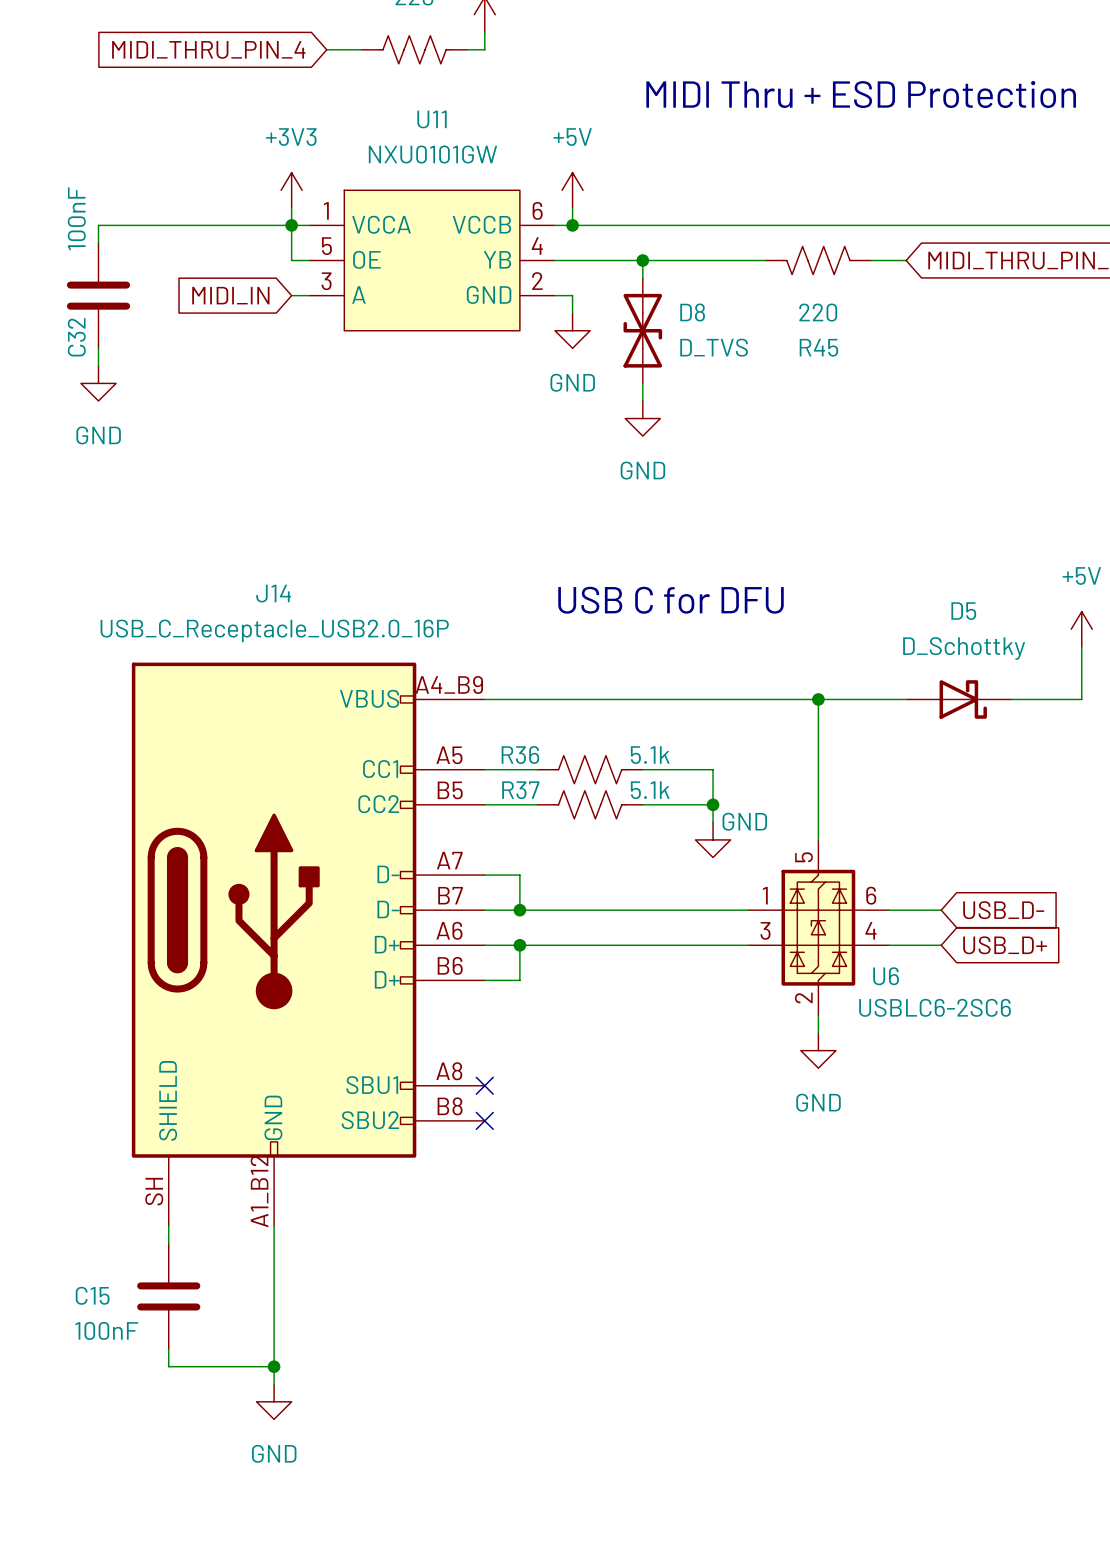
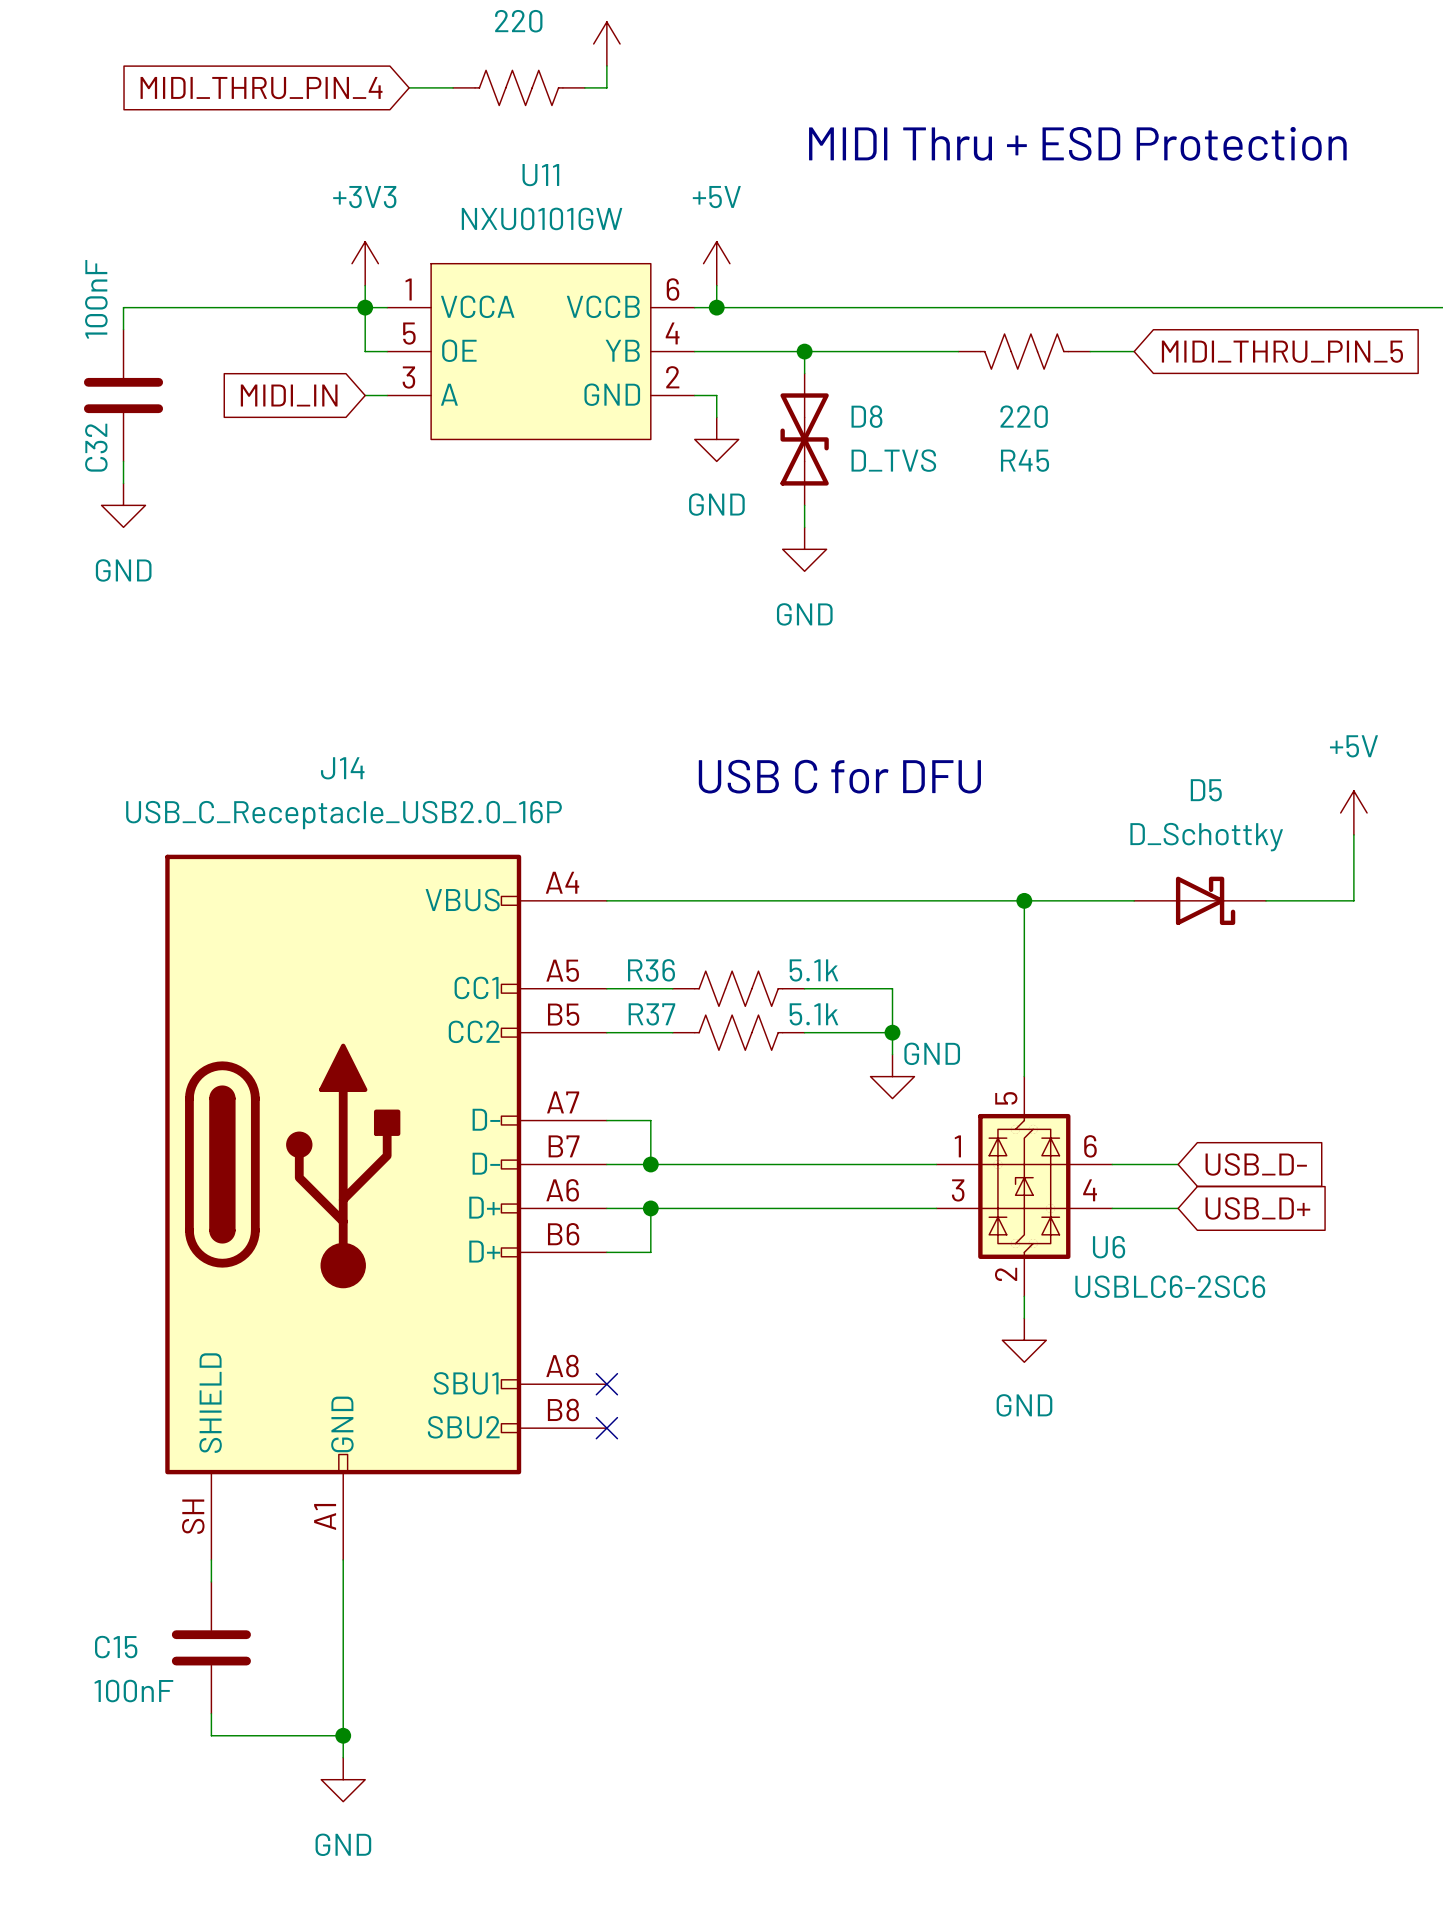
J14 pin number: A4_B9 (449, 685) -> A4 (562, 882)
J14 pin number: A1_B12 (259, 1191) -> A1 (325, 1516)

